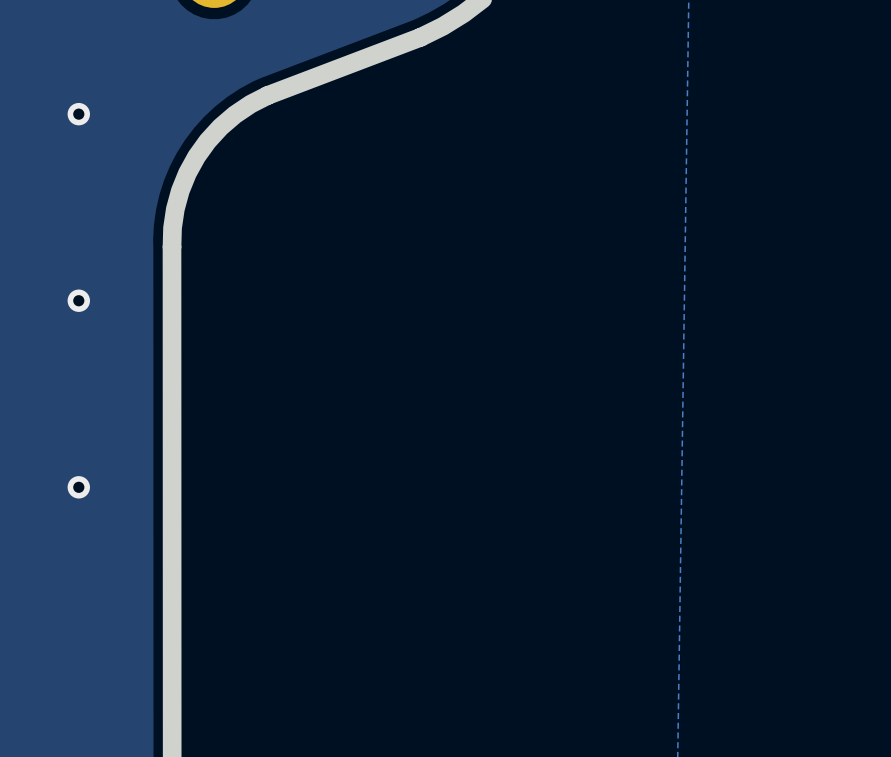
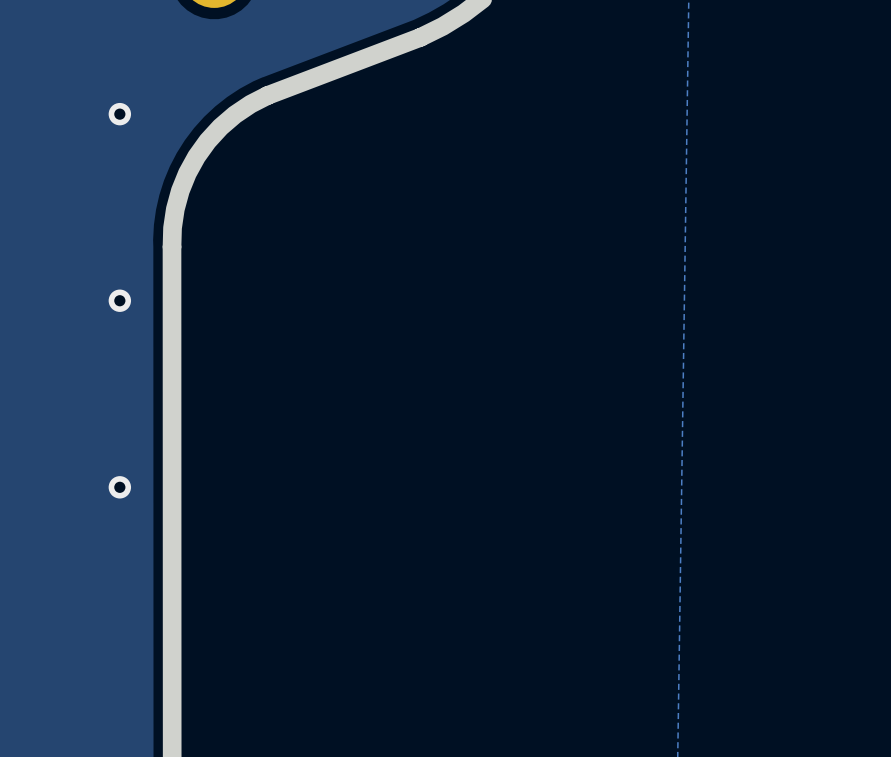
via position: (78, 114) -> (119, 114)
via position: (78, 300) -> (119, 300)
via position: (78, 487) -> (119, 487)

